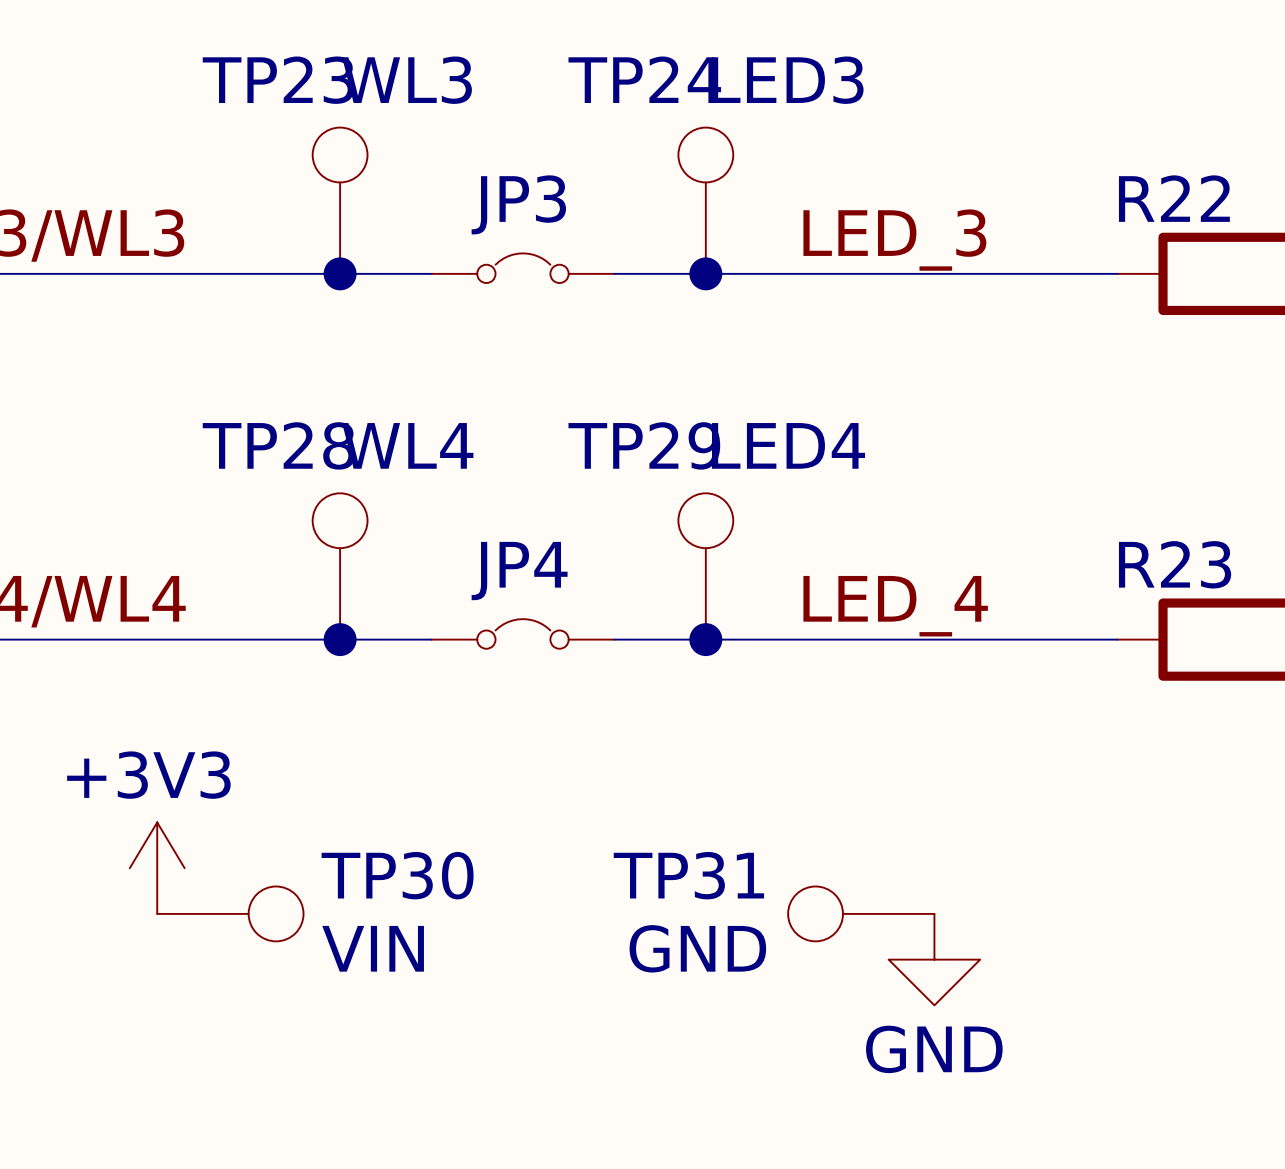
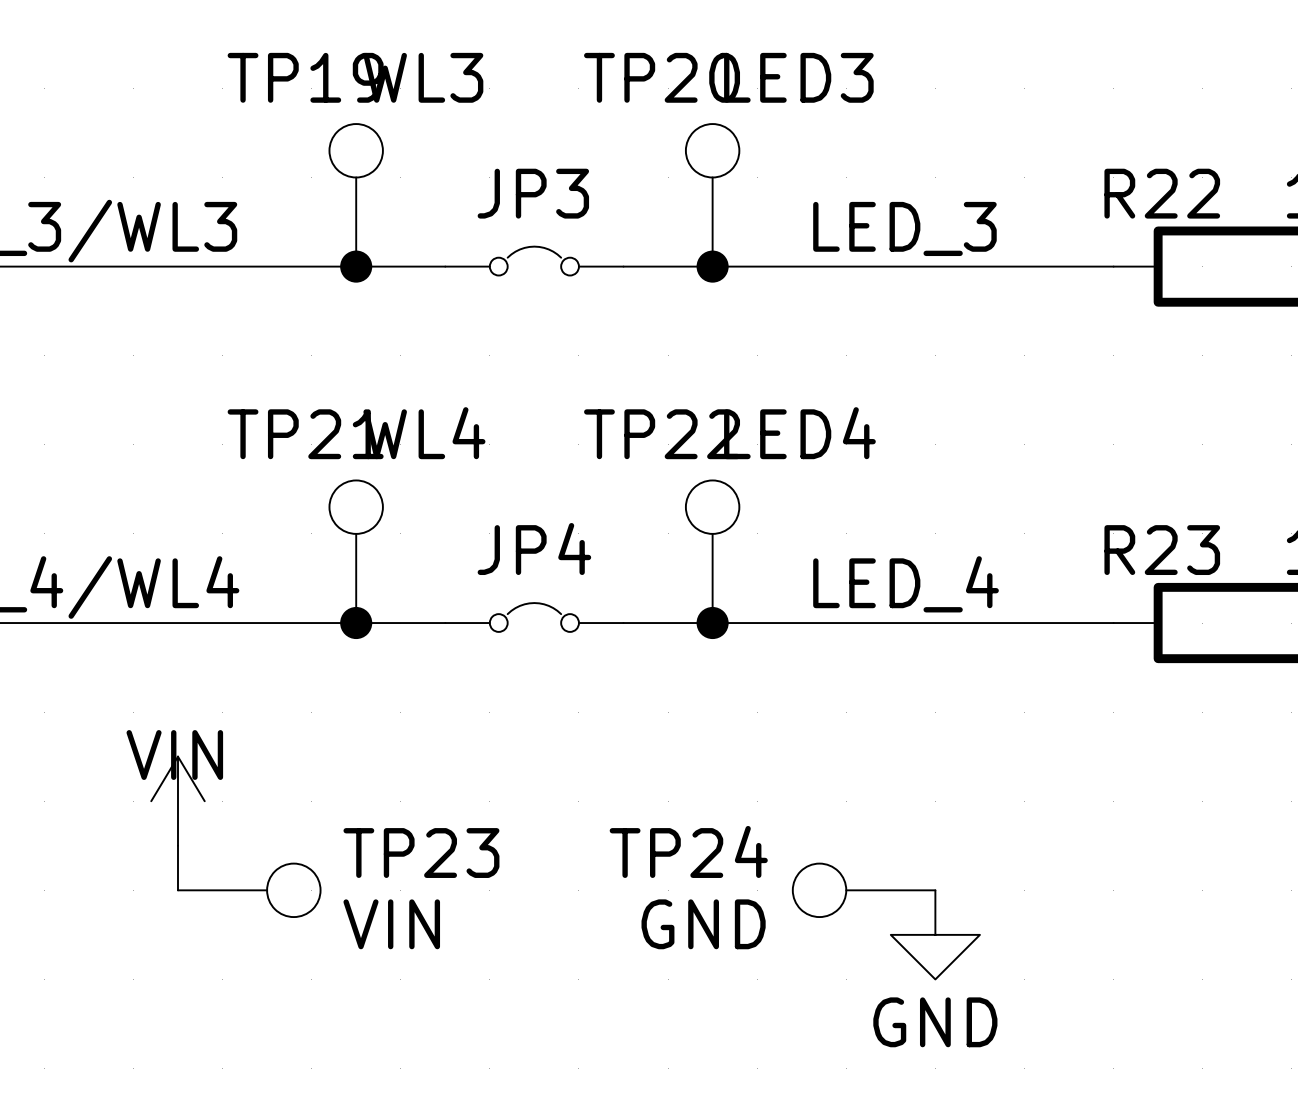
TP24 name: TP24 (644, 79) -> TP20 (662, 77)
TP23 name: TP23 (278, 80) -> TP19 (305, 77)
TP28 name: TP28 (278, 445) -> TP21 (305, 434)
TP29 name: TP29 (644, 445) -> TP22 (662, 434)
power symbol: none -> VIN (177, 801)
power symbol: +3V3 (157, 868) -> none
TP30 name: TP30 (397, 875) -> TP23 (421, 853)
TP31 name: TP31 (688, 875) -> TP24 (688, 851)

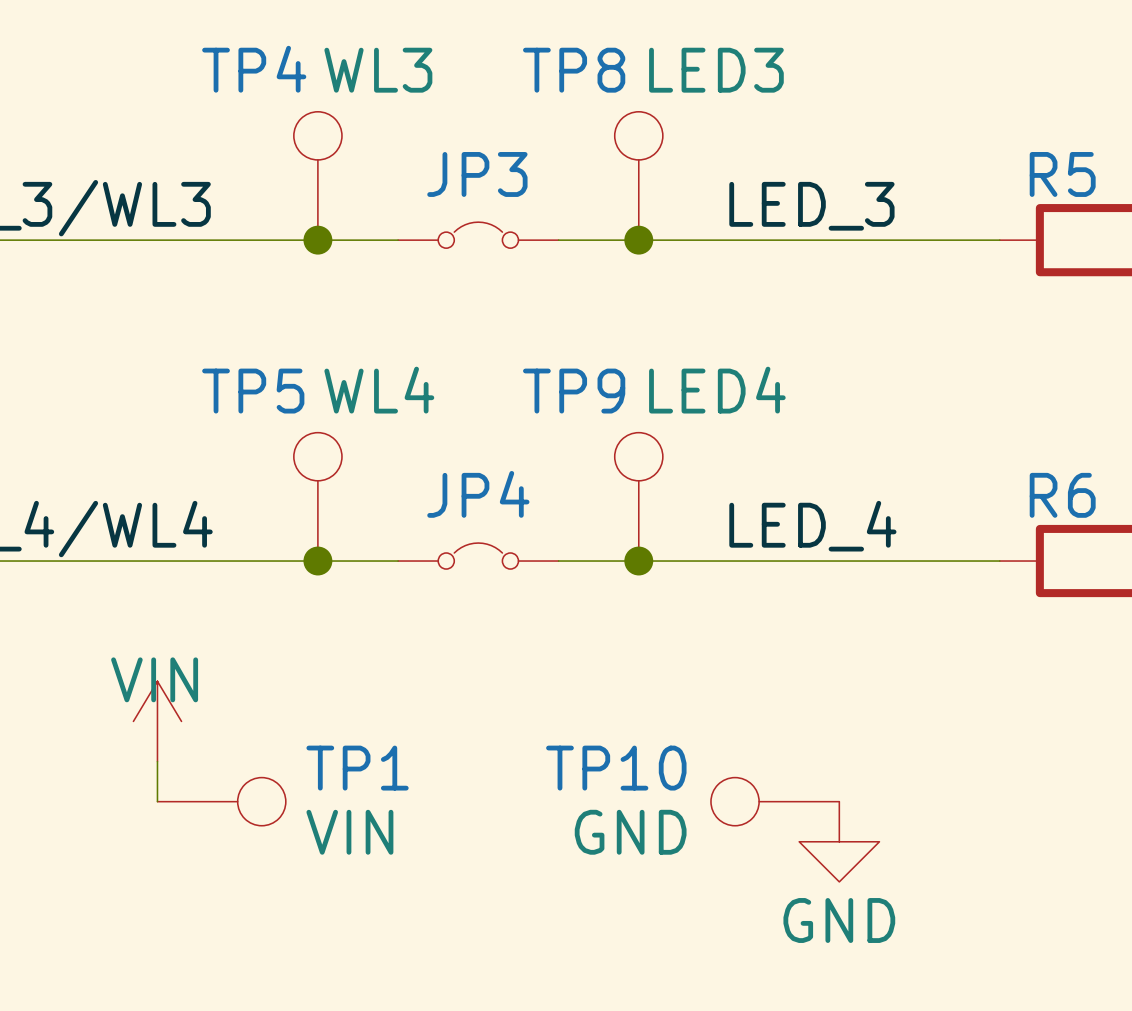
TP19 name: TP19 (305, 77) -> TP4 (254, 69)
TP20 name: TP20 (662, 77) -> TP8 (574, 70)
R22 name: R22 (1162, 193) -> R5 (1062, 174)
TP21 name: TP21 (305, 434) -> TP5 (253, 391)
TP22 name: TP22 (662, 434) -> TP9 (574, 391)
R23 name: R23 (1162, 550) -> R6 (1062, 495)
TP24 name: TP24 (688, 851) -> TP10 (616, 768)
TP23 name: TP23 (421, 853) -> TP1 (357, 768)

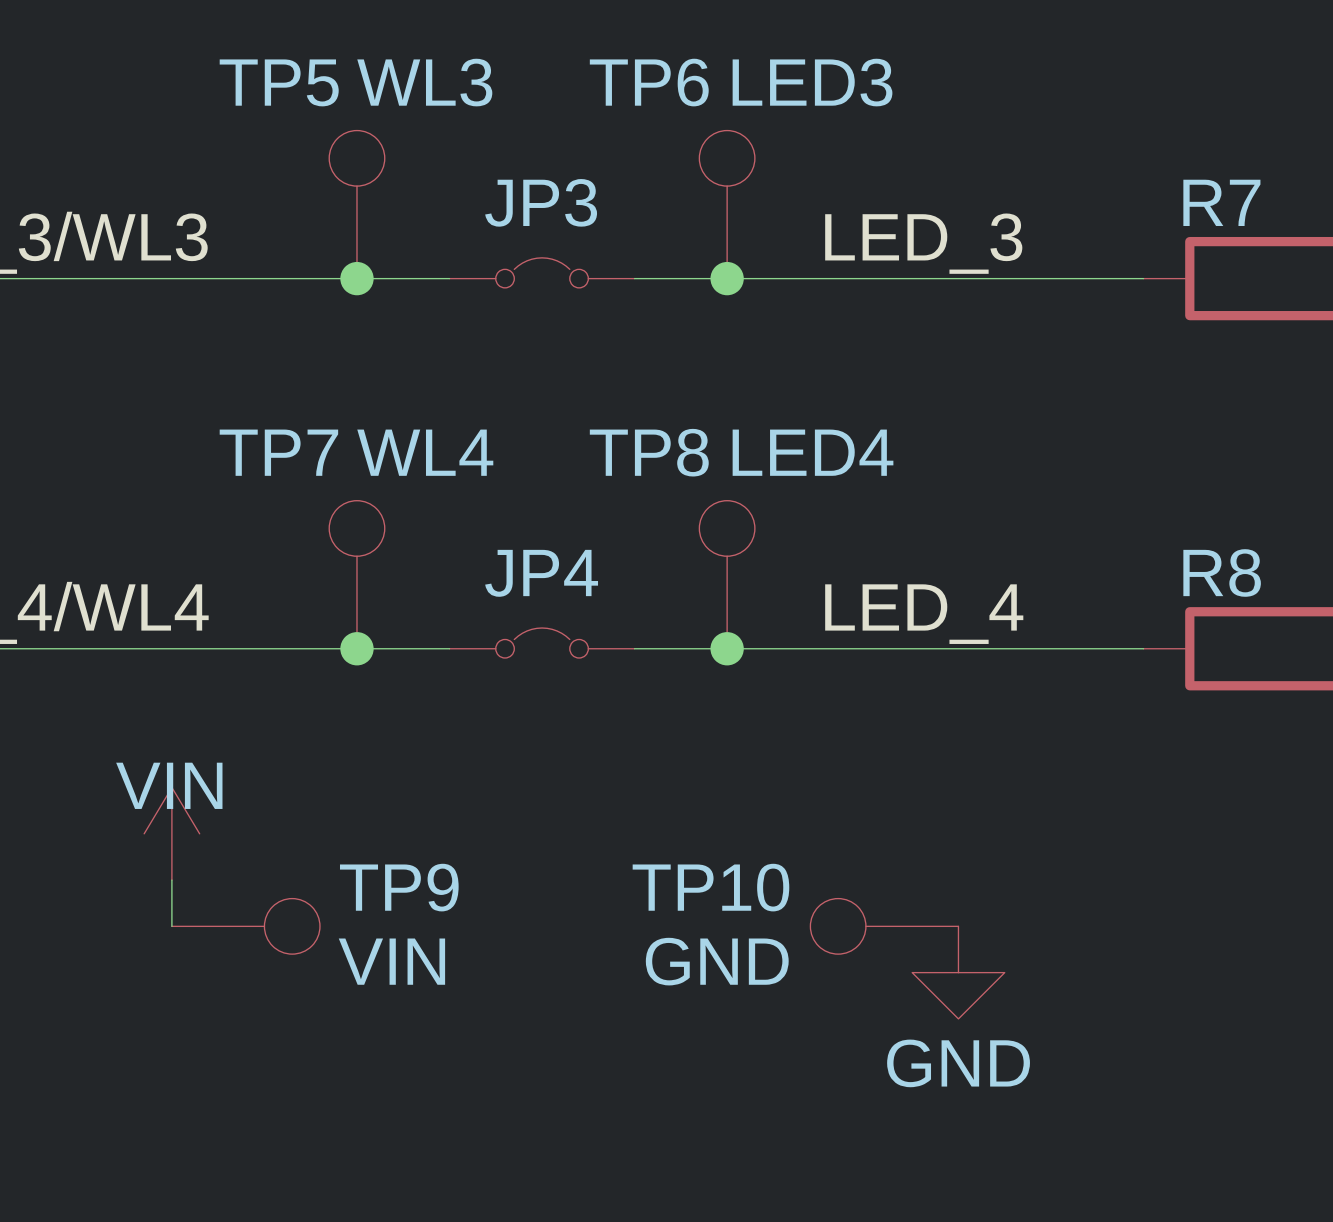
TP4 name: TP4 (254, 69) -> TP5 (279, 82)
TP8 name: TP8 (574, 70) -> TP6 (649, 82)
R5 name: R5 (1062, 174) -> R7 (1221, 202)
TP5 name: TP5 (253, 391) -> TP7 (278, 452)
TP9 name: TP9 (574, 391) -> TP8 (649, 452)
R6 name: R6 (1062, 495) -> R8 (1222, 572)
TP1 name: TP1 (357, 768) -> TP9 (399, 887)

